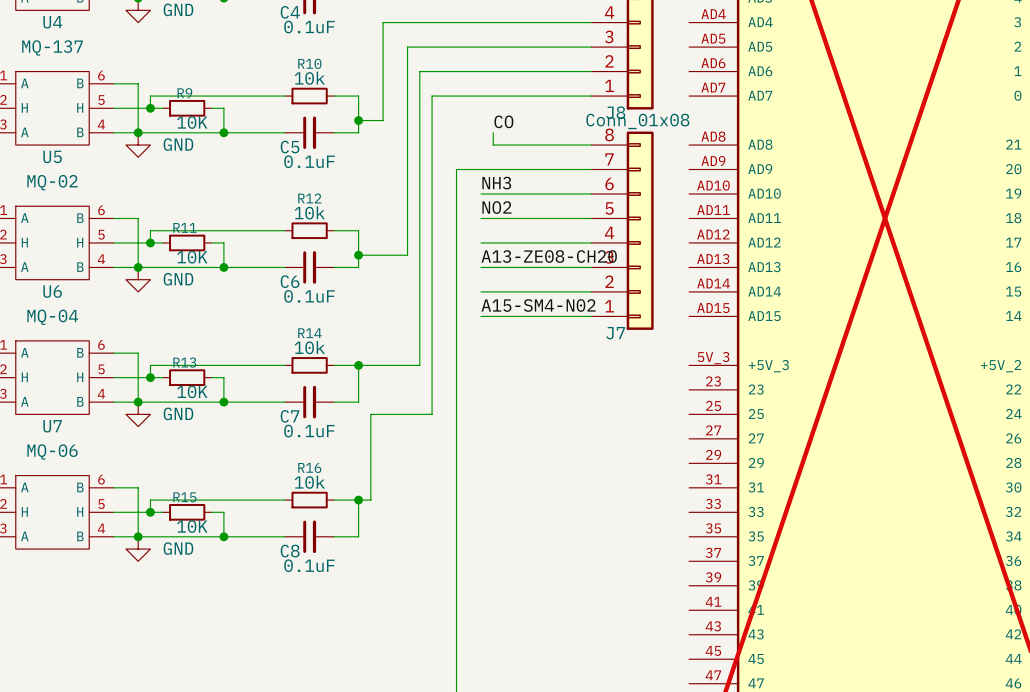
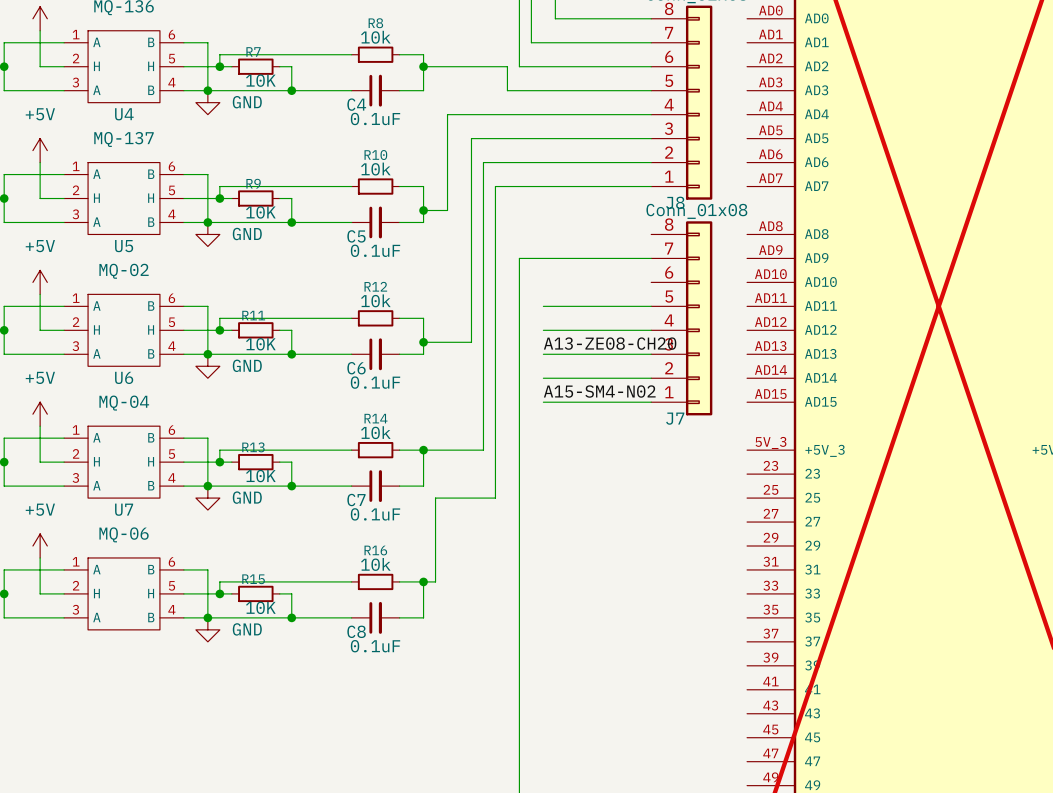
label: CO (503, 121) -> none
wire: (493, 132) (493, 145) (591, 145) -> none
label: NH3 (496, 183) -> none
wire: (481, 193) (591, 193) -> none
label: NO2 (496, 207) -> none

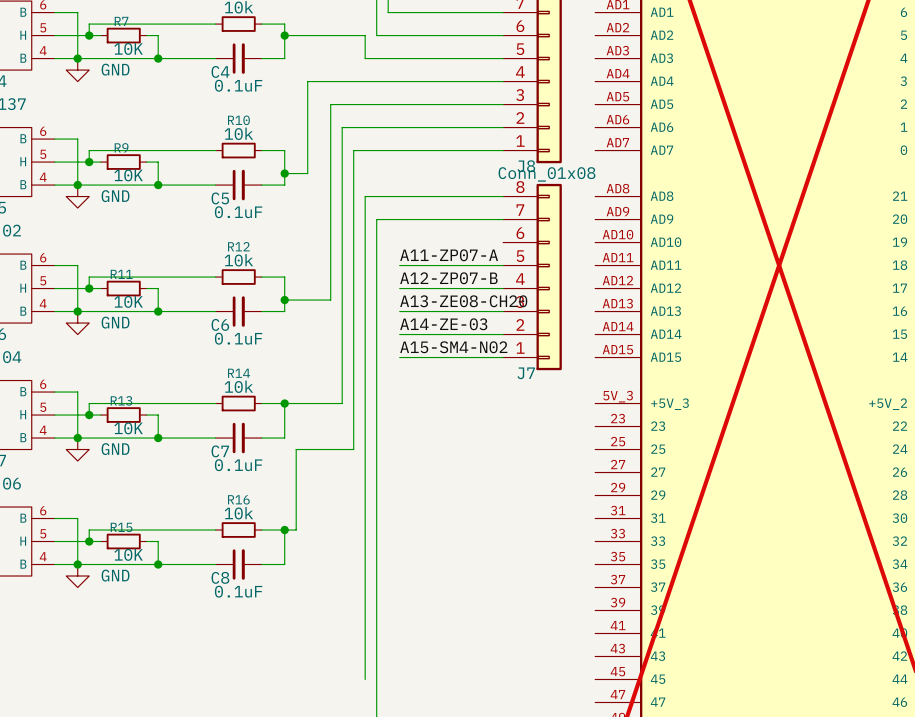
wire: none -> (503, 196) (365, 196) (365, 679)
label: none -> A11-ZP07-A (449, 255)
label: none -> A12-ZP07-B (448, 278)
label: none -> A14-ZE-03 (443, 324)

